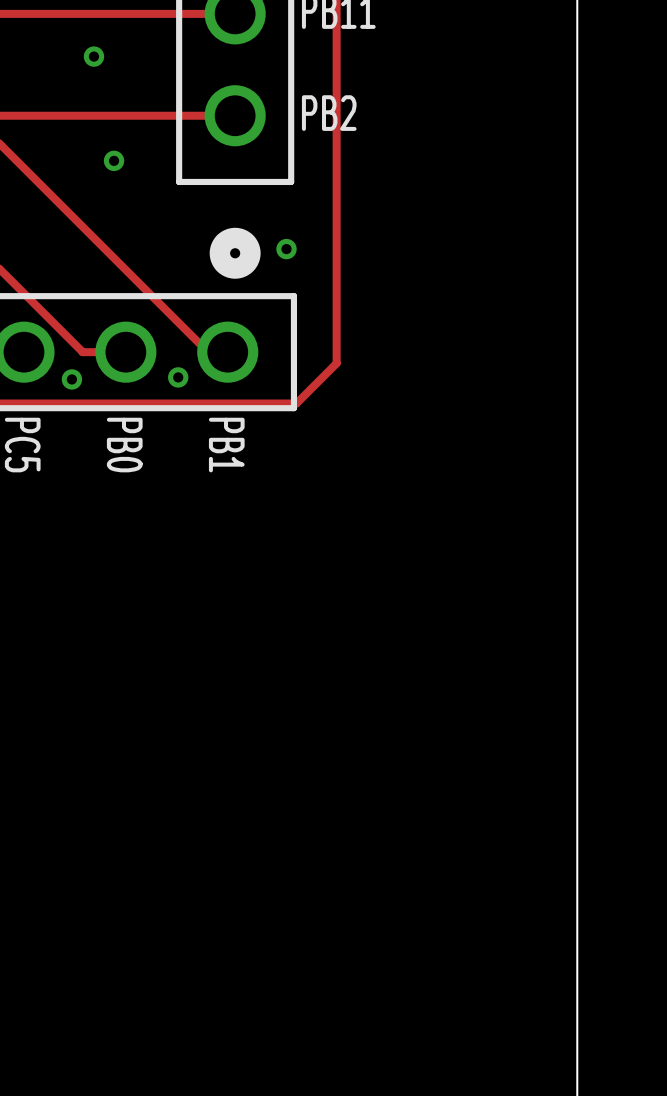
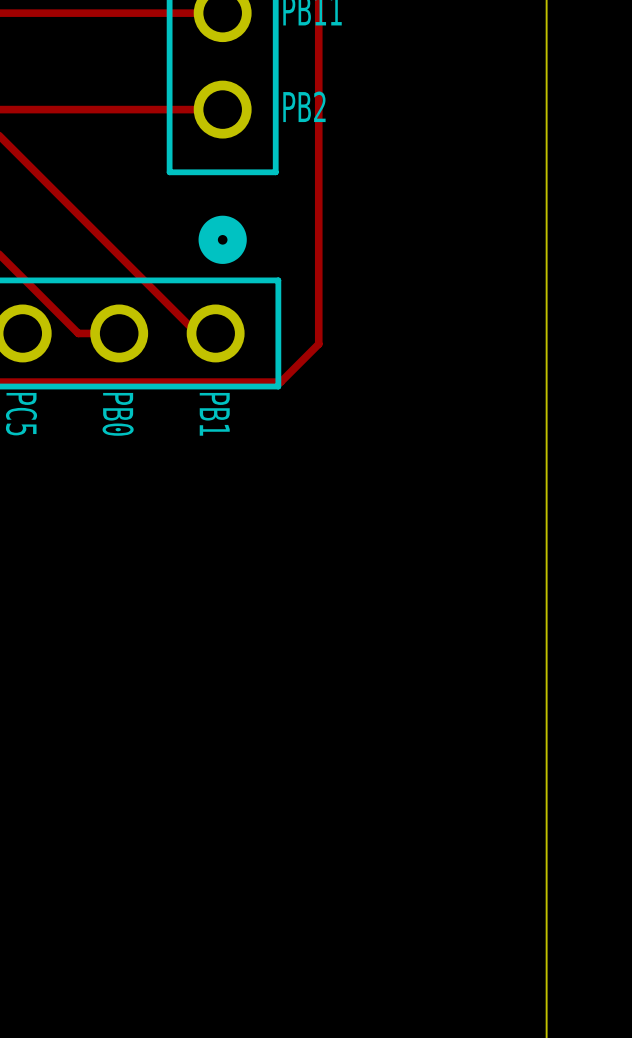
via: (93, 56) -> none
via: (114, 160) -> none
via: (286, 249) -> none
via: (178, 377) -> none
via: (71, 379) -> none

